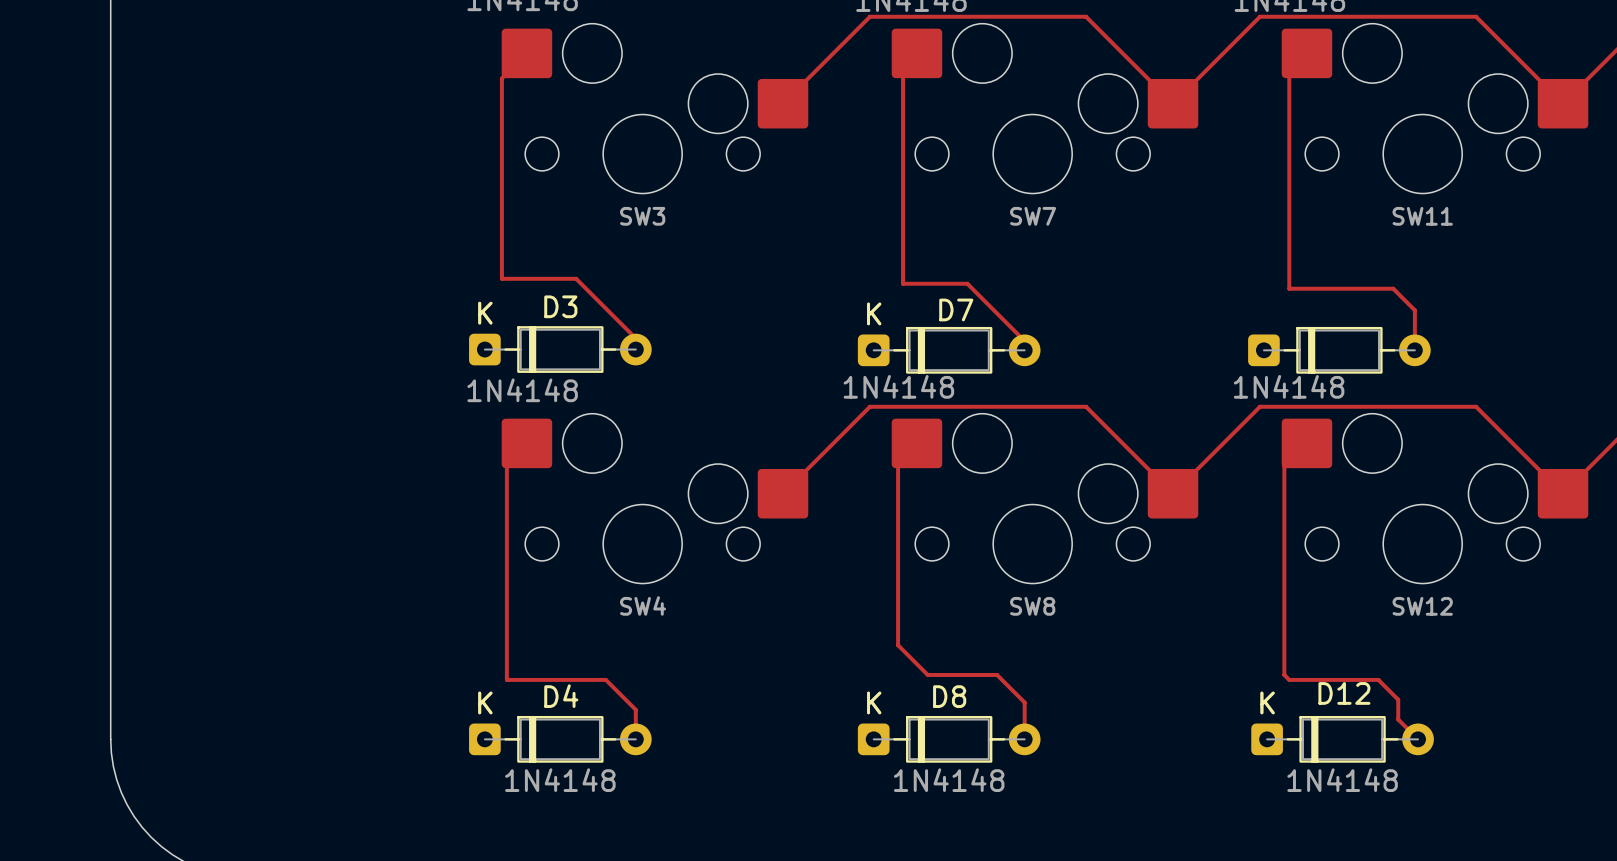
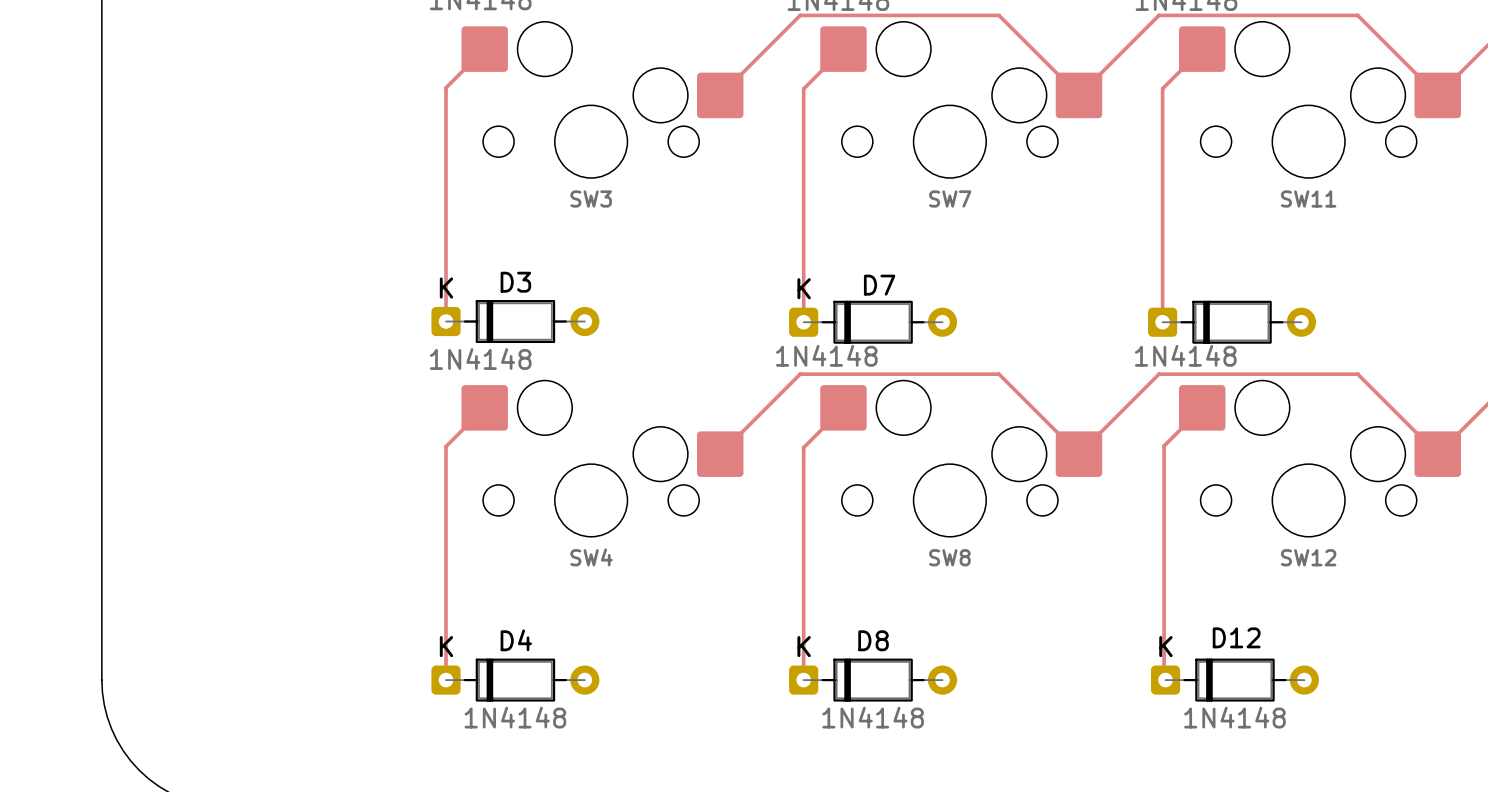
track: (903, 67) (903, 283) (967, 283) (1024, 341) (1024, 350) -> (830, 61) (803, 88) (803, 322)
track: (1289, 71) (1289, 288) (1393, 288) (1414, 310) (1414, 350) -> (1185, 65) (1162, 88) (1162, 322)
track: (501, 78) (501, 278) (576, 278) (635, 338) (635, 349) -> (461, 72) (446, 87) (446, 321)
track: (898, 462) (898, 645) (927, 674) (997, 674) (1024, 702) (1024, 739) -> (826, 425) (803, 447) (803, 680)
track: (506, 463) (506, 679) (605, 679) (635, 709) (635, 739) -> (466, 426) (446, 446) (446, 680)
track: (1284, 466) (1284, 674) (1289, 679) (1378, 679) (1398, 699) (1398, 719) (1418, 739) -> (1181, 428) (1164, 445) (1164, 685)

